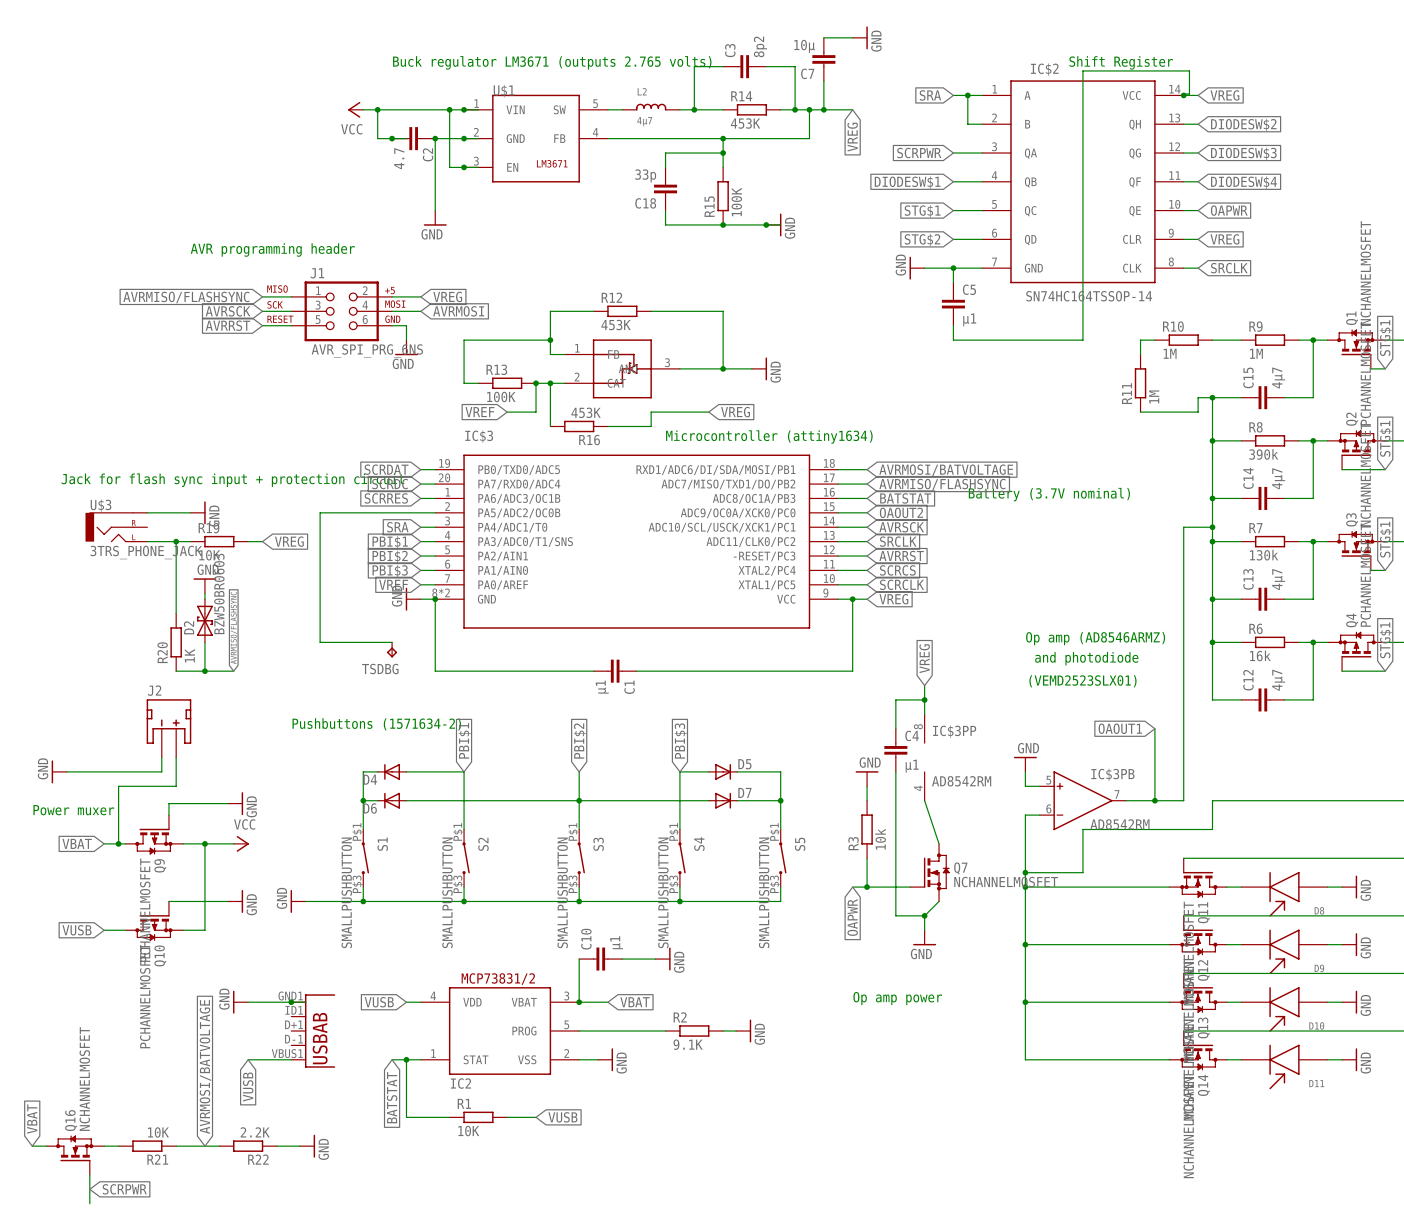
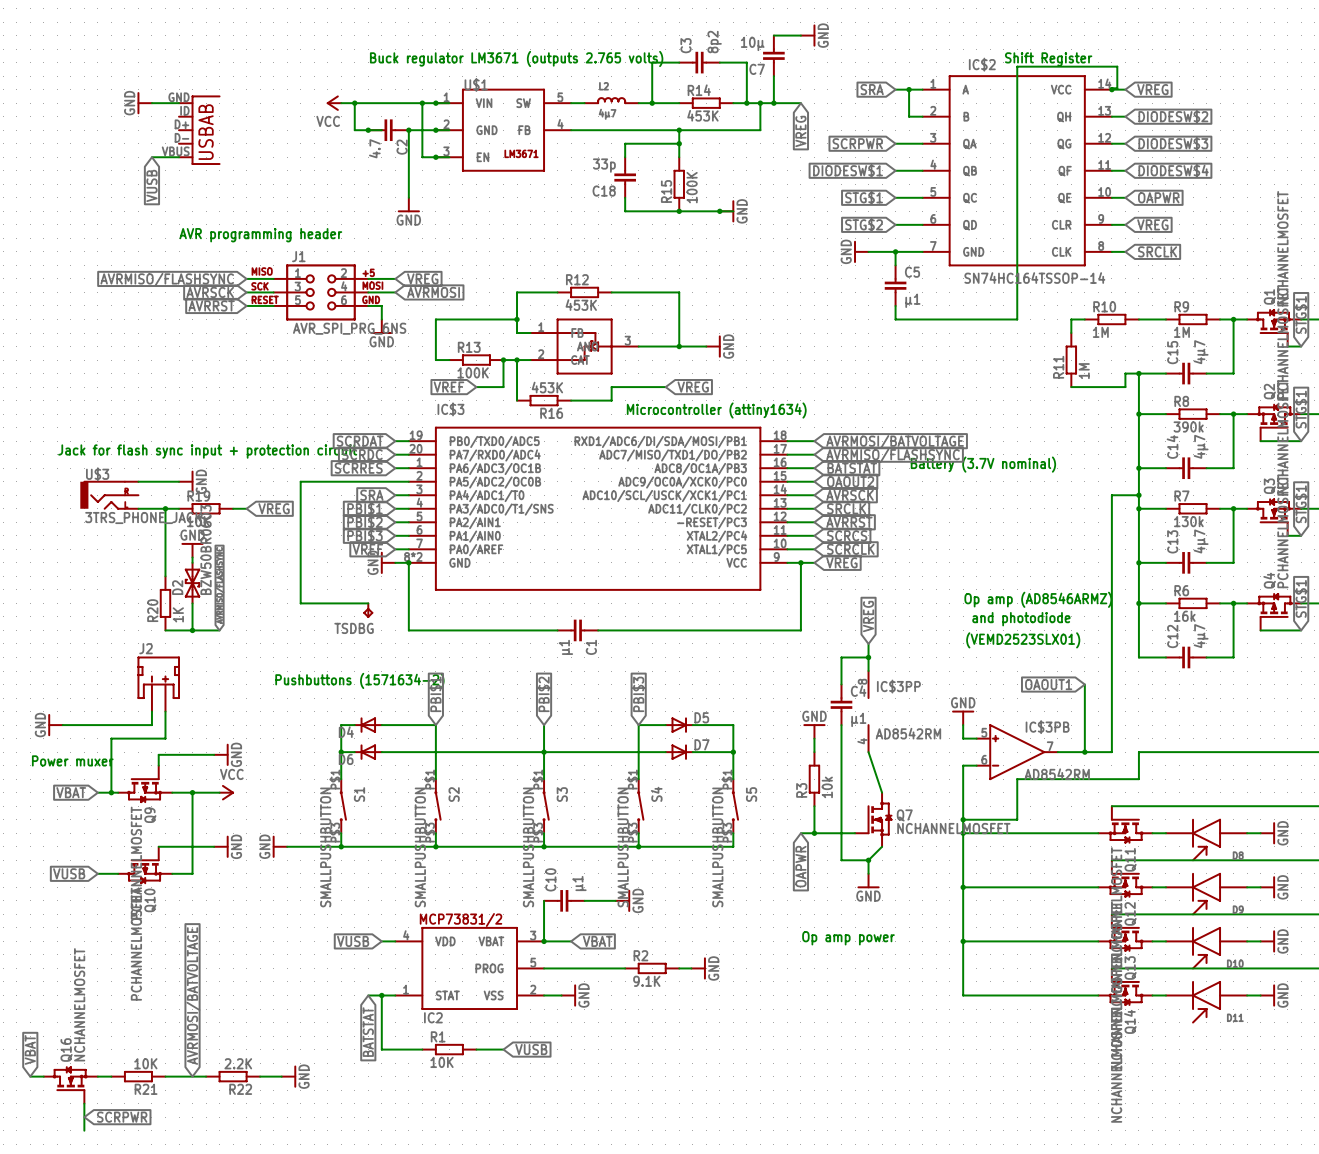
power symbol: none -> GND (144, 103)
wire: none -> (151, 103) (179, 103)
part: none -> (199, 130)
wire: none -> (151, 157) (179, 157)
global label: none -> VUSB (151, 185)
power symbol: GND (240, 1002) -> none
wire: (248, 1002) (305, 1002) -> none
junction: (291, 1002) -> none
part: (313, 1031) -> none
wire: (248, 1059) (291, 1059) -> none
global label: VUSB (248, 1086) -> none

